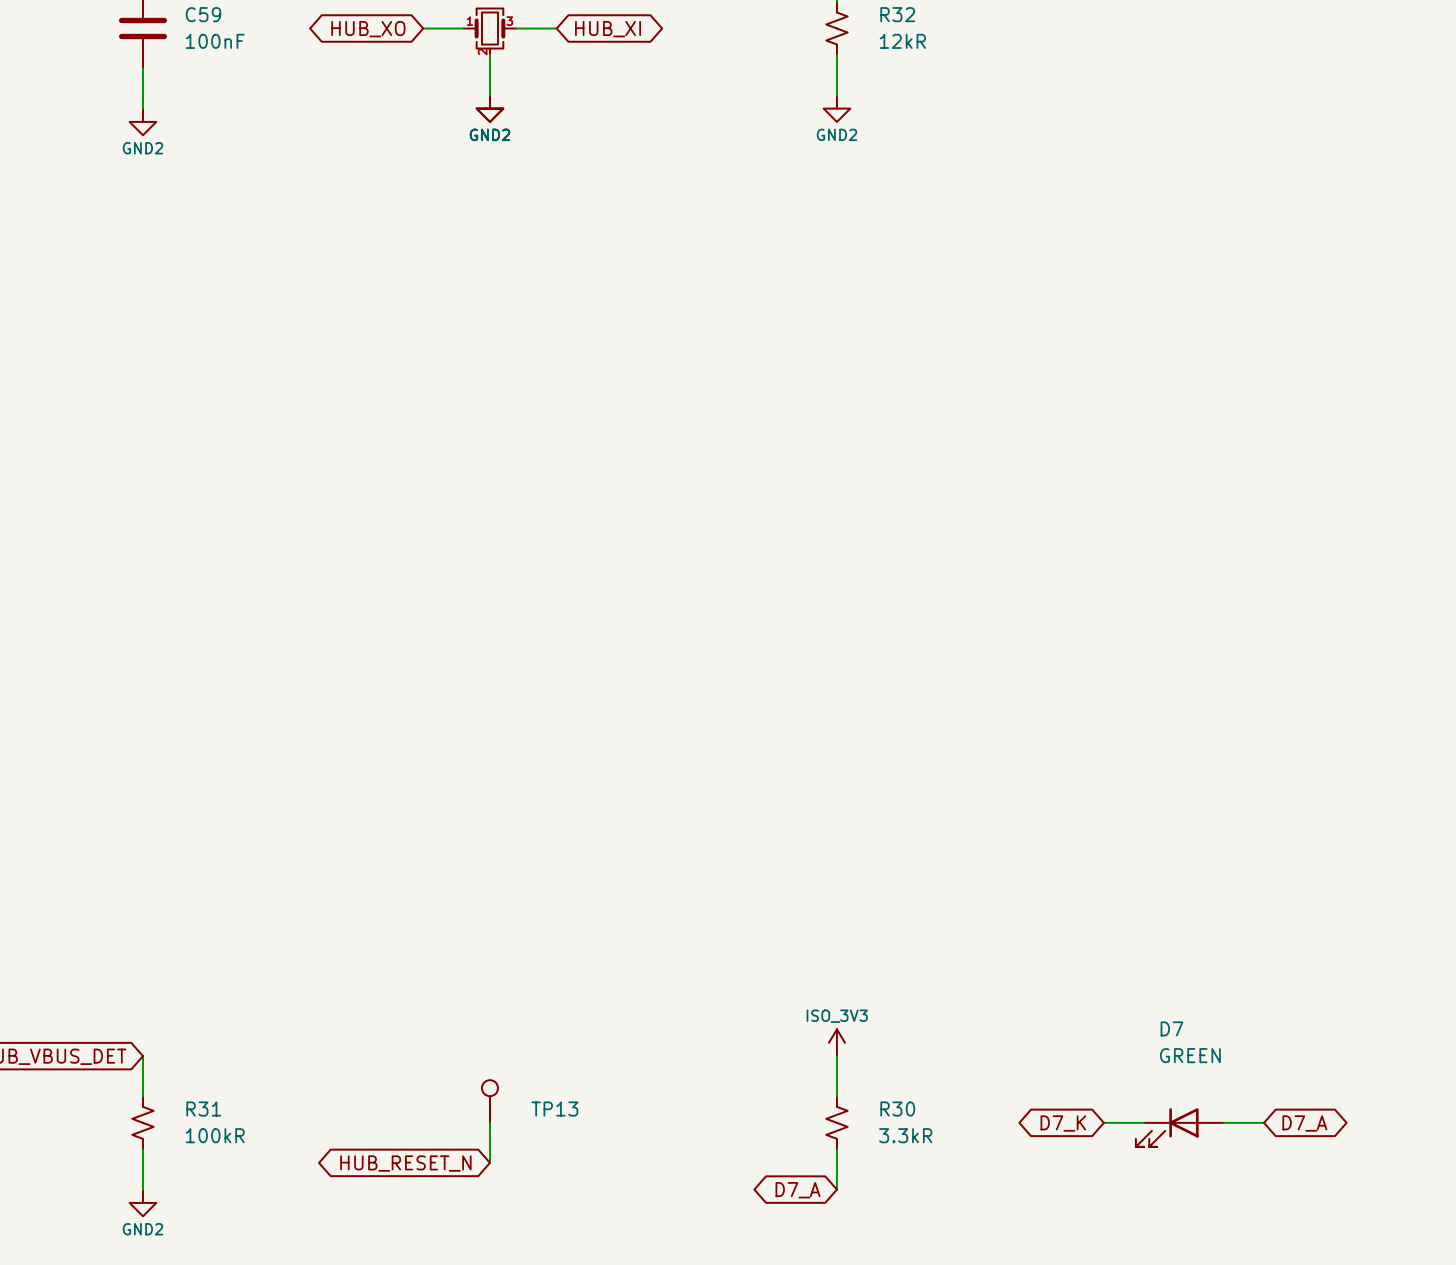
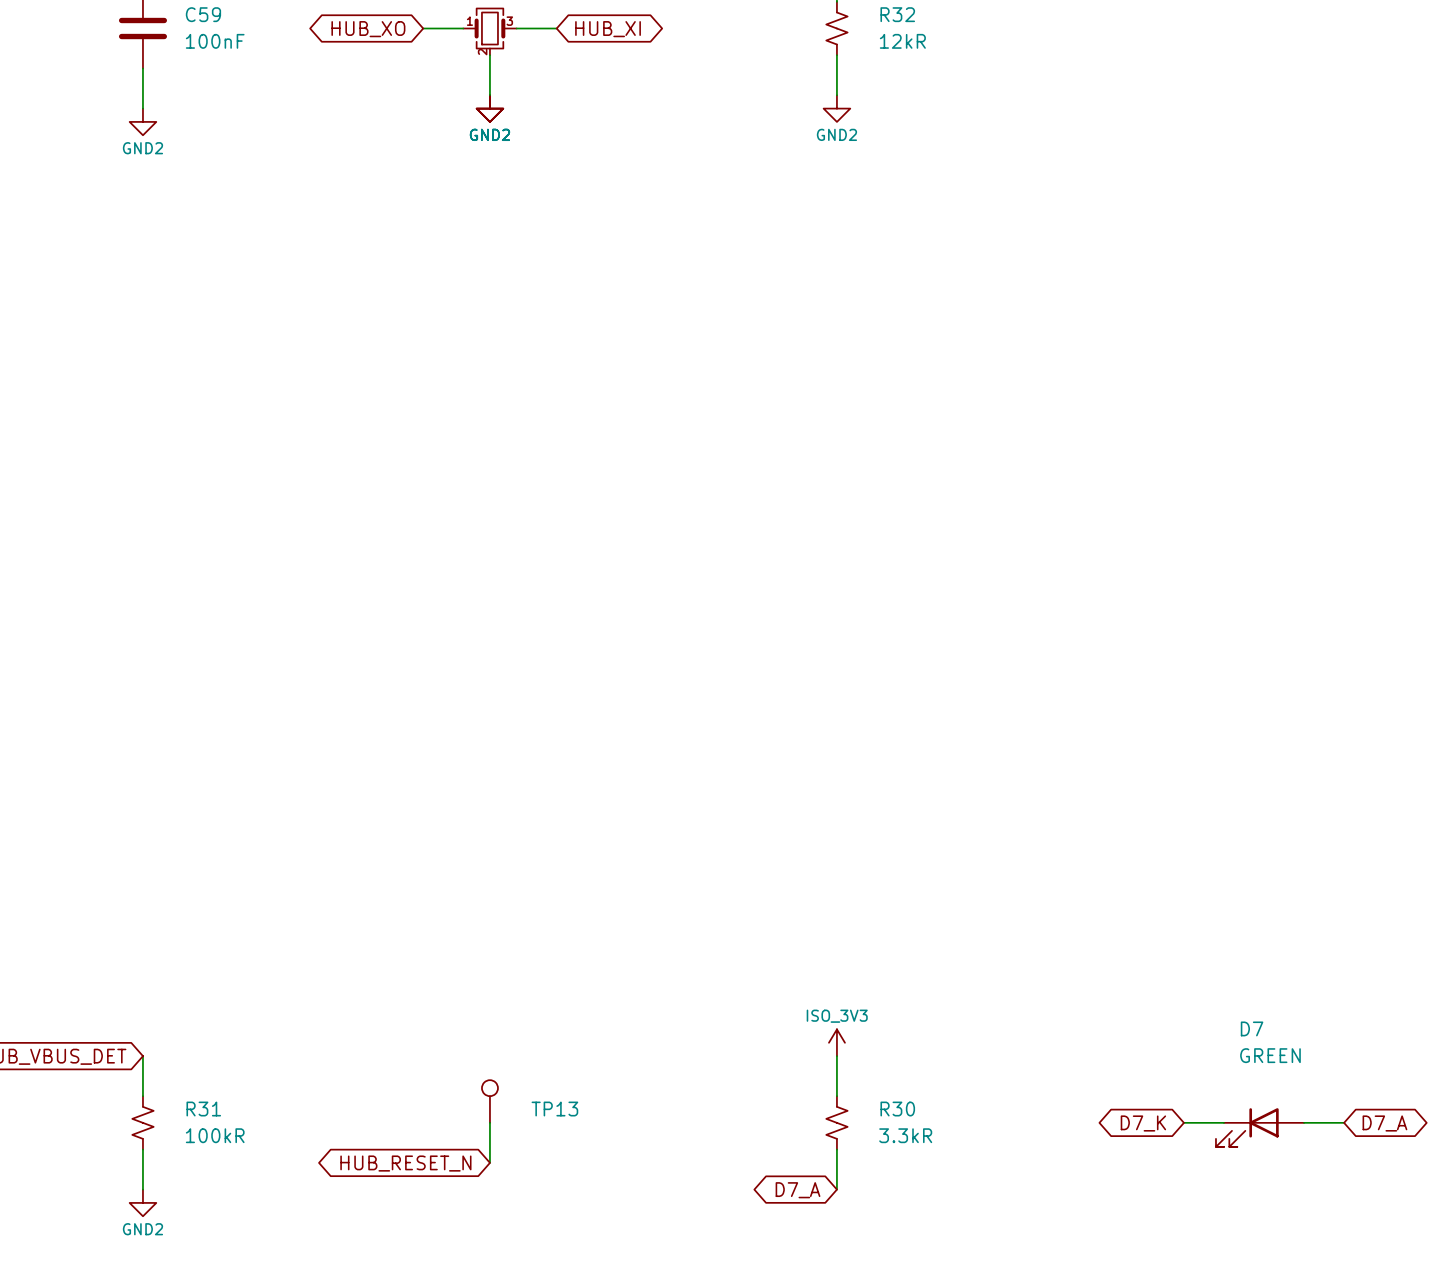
wire: (1103, 1122) (1143, 1122) -> (1304, 1122) (1344, 1122)
global label position: D7_K (1063, 1123) -> D7_K (1143, 1123)
global label position: D7_A (1304, 1123) -> D7_A (1384, 1123)
D7 position: (1179, 1127) -> (1260, 1127)

